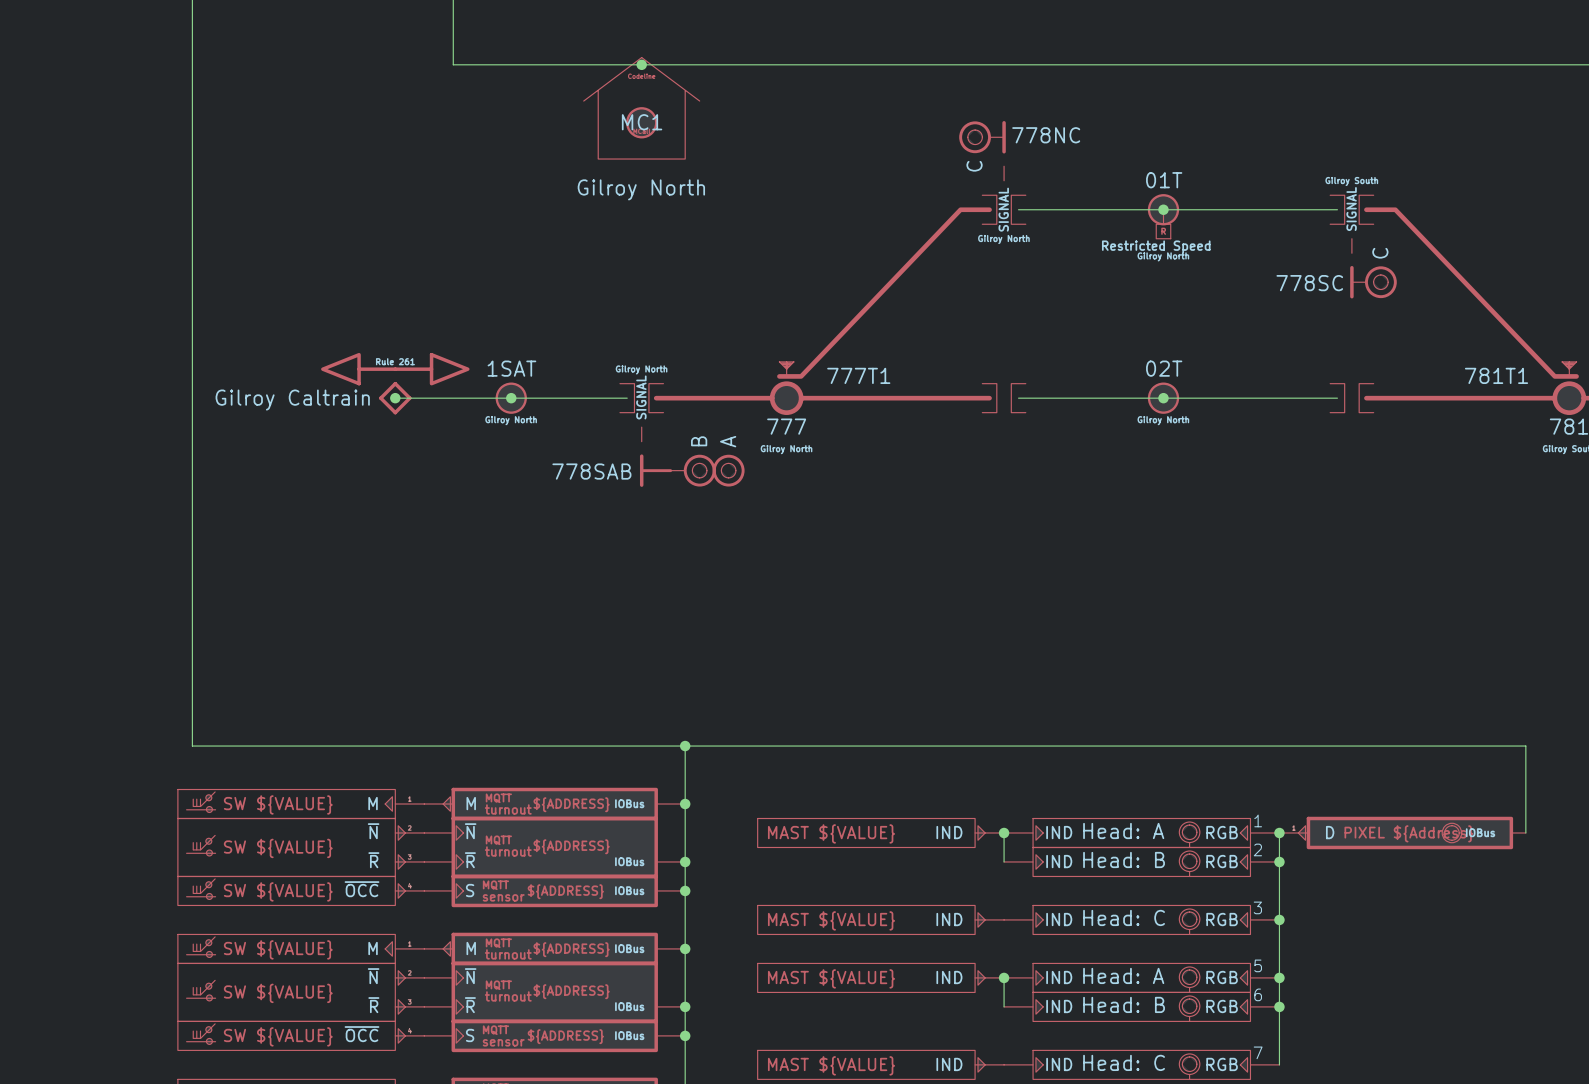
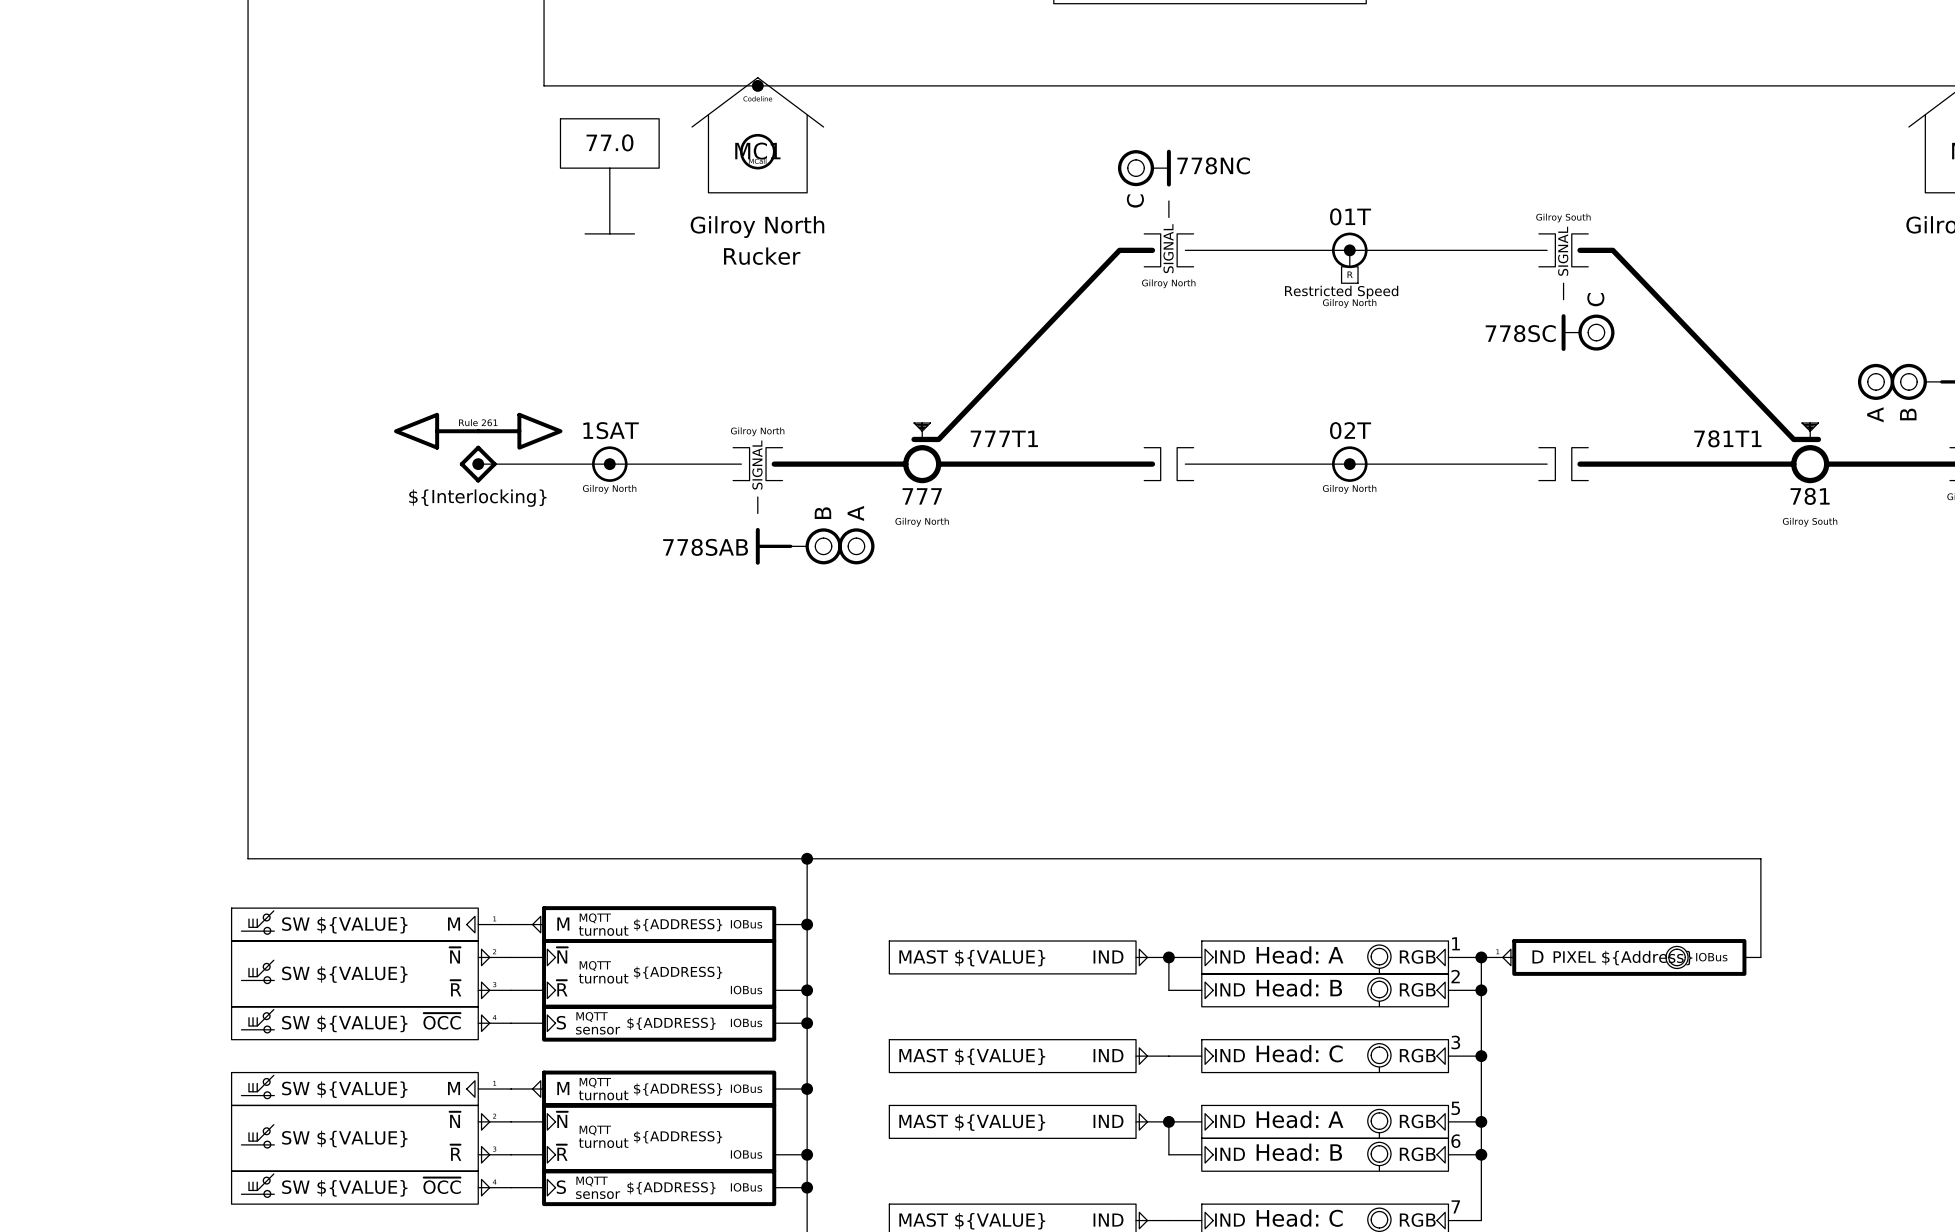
part: none -> 77.0 (609, 176)
text: none -> Rucker (762, 256)
part value: Gilroy Caltrain (292, 400) -> none
part text: none -> ${Interlocking} (477, 498)

